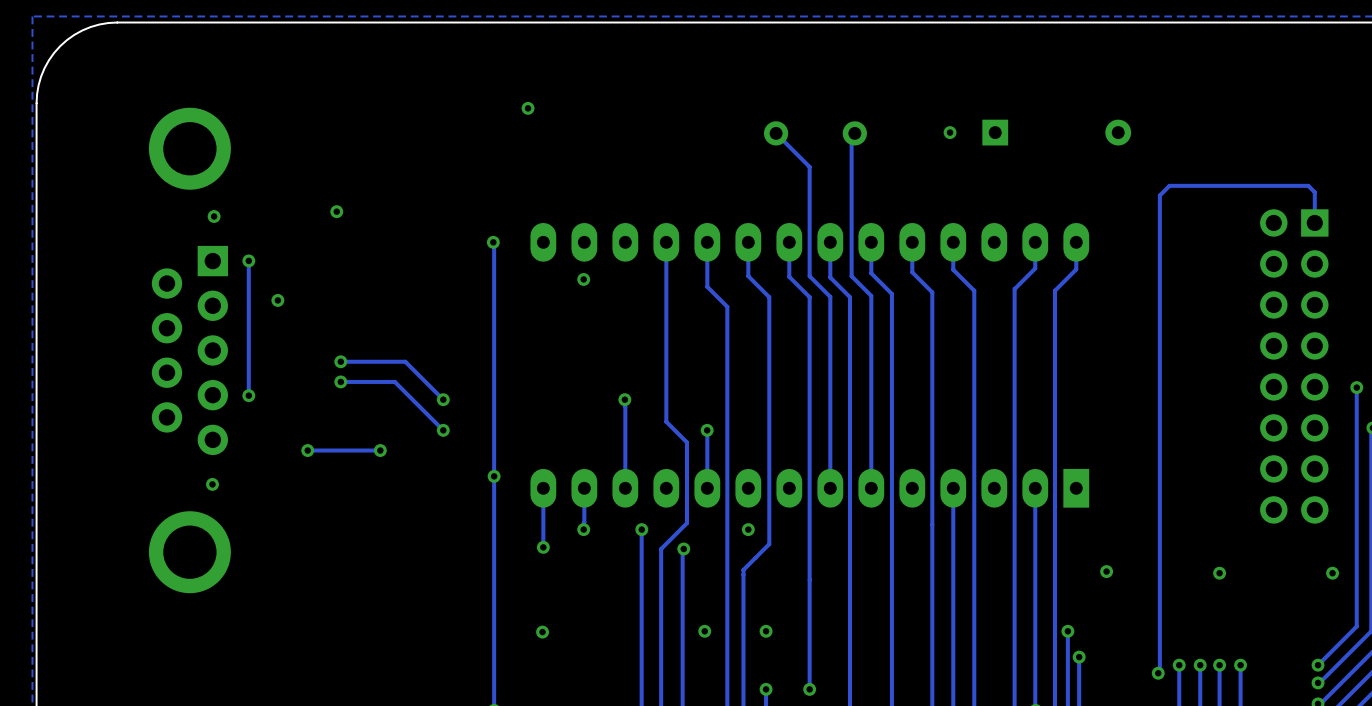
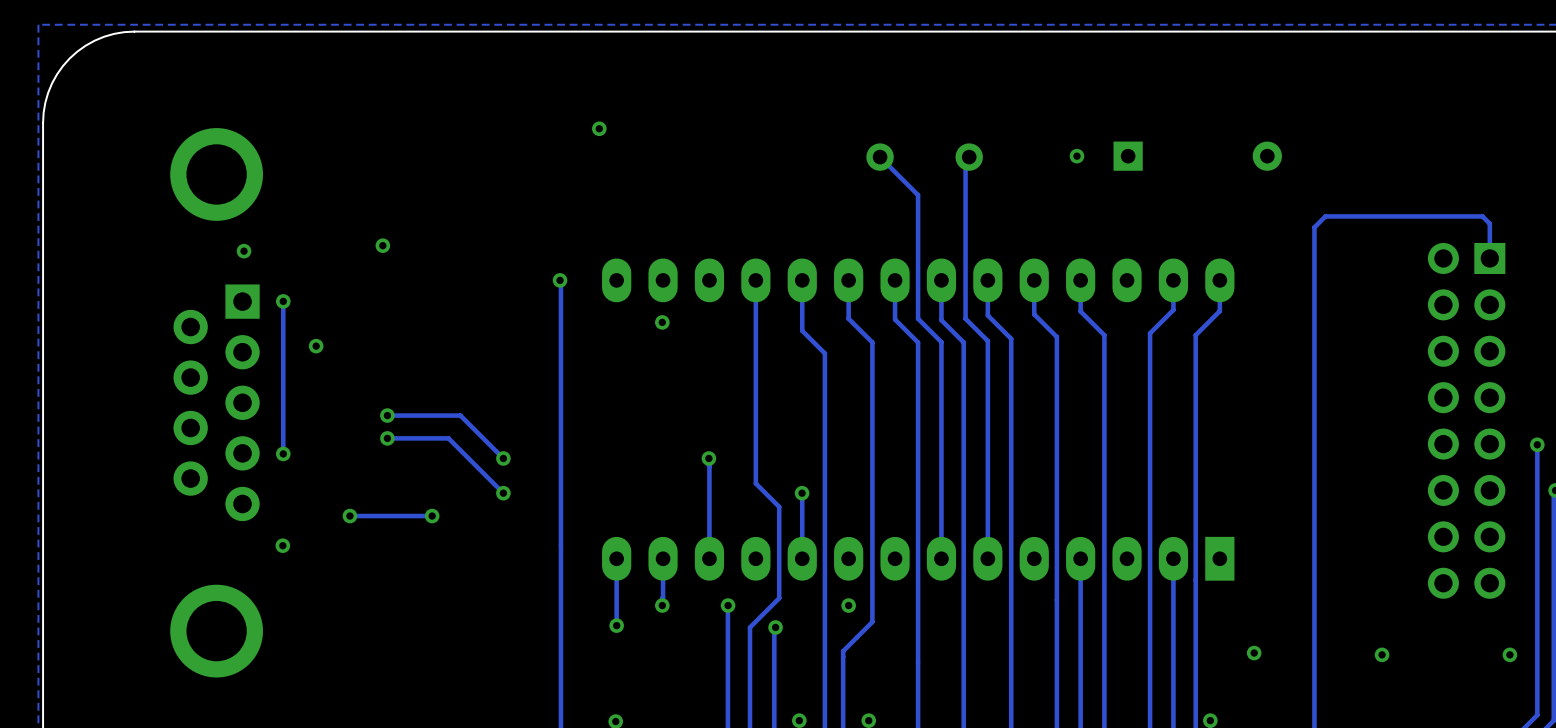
via: (494, 476) -> none
via position: (212, 484) -> (282, 545)

